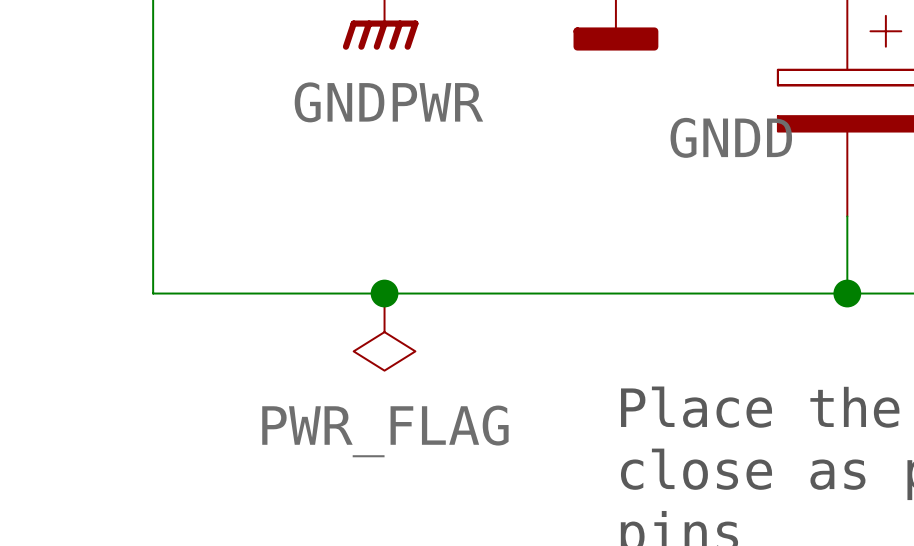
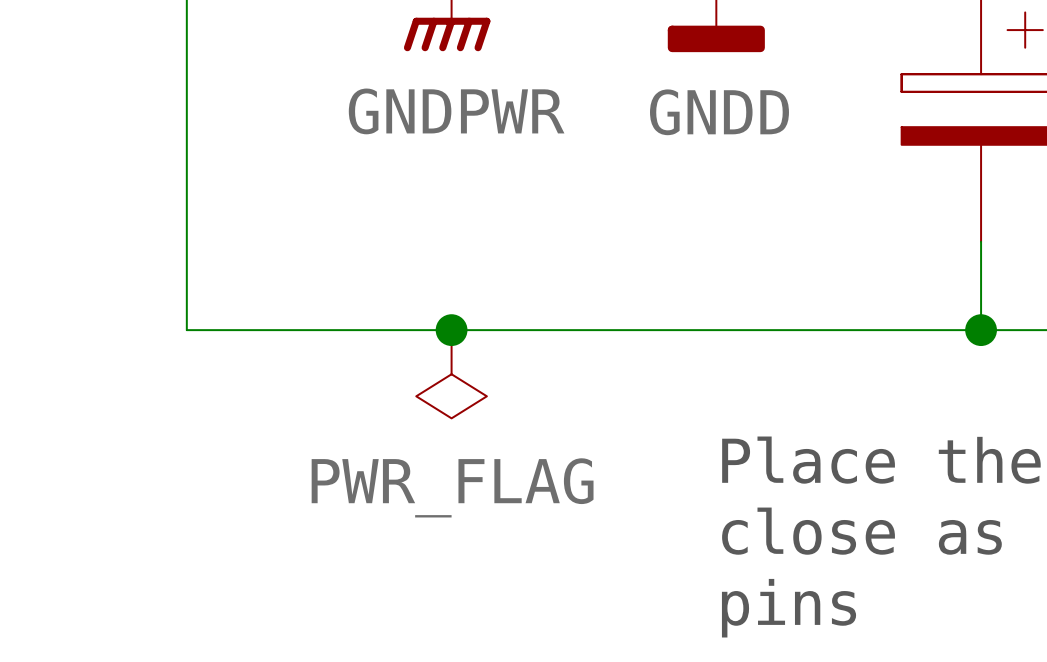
power symbol text position: GNDD (731, 137) -> GNDD (719, 112)

